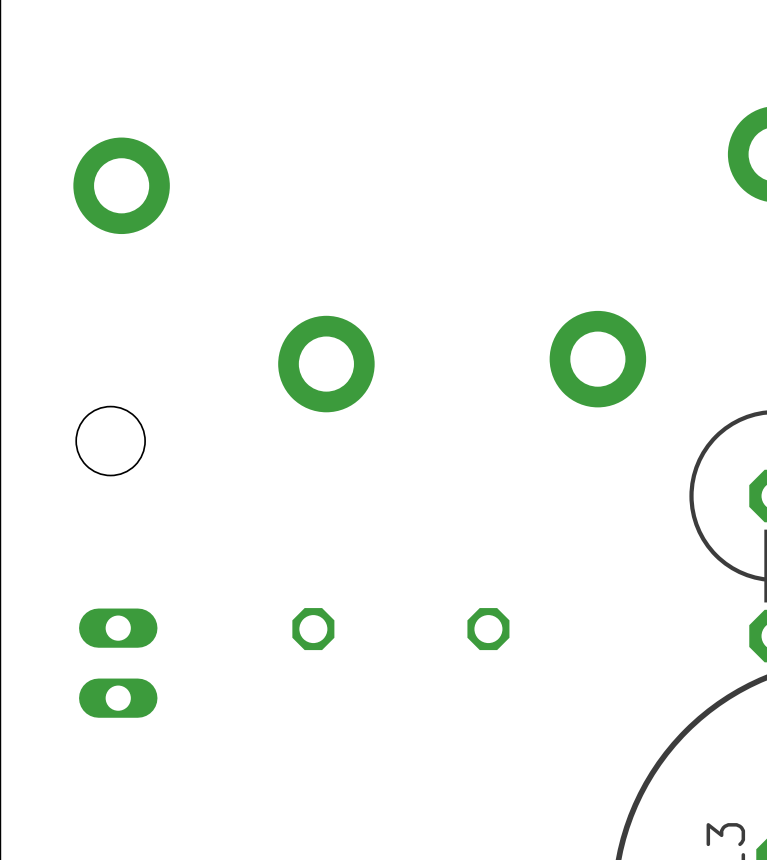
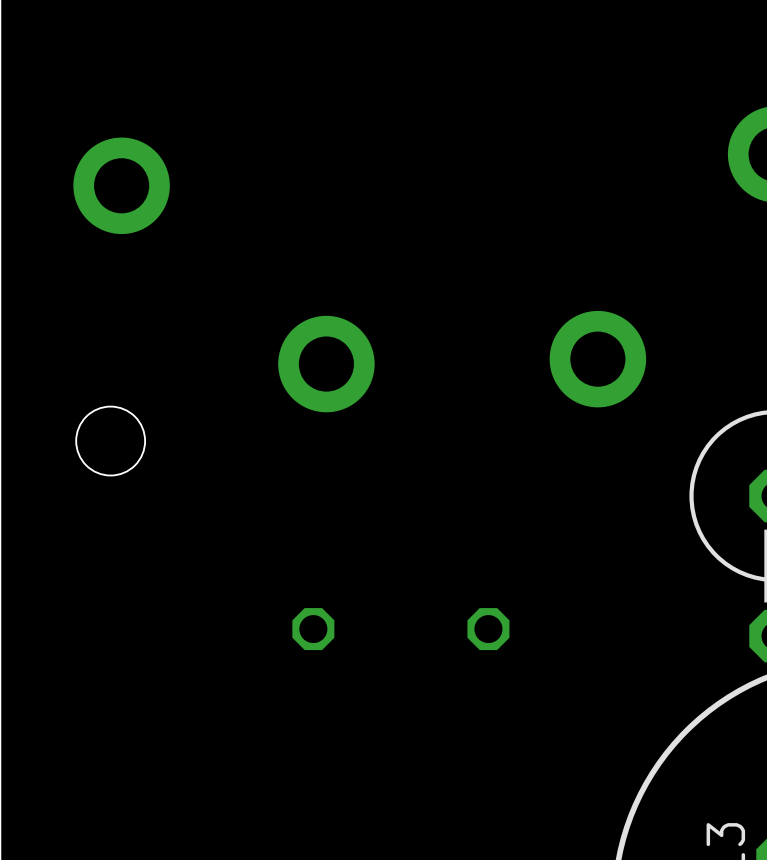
part: (118, 663) -> none

